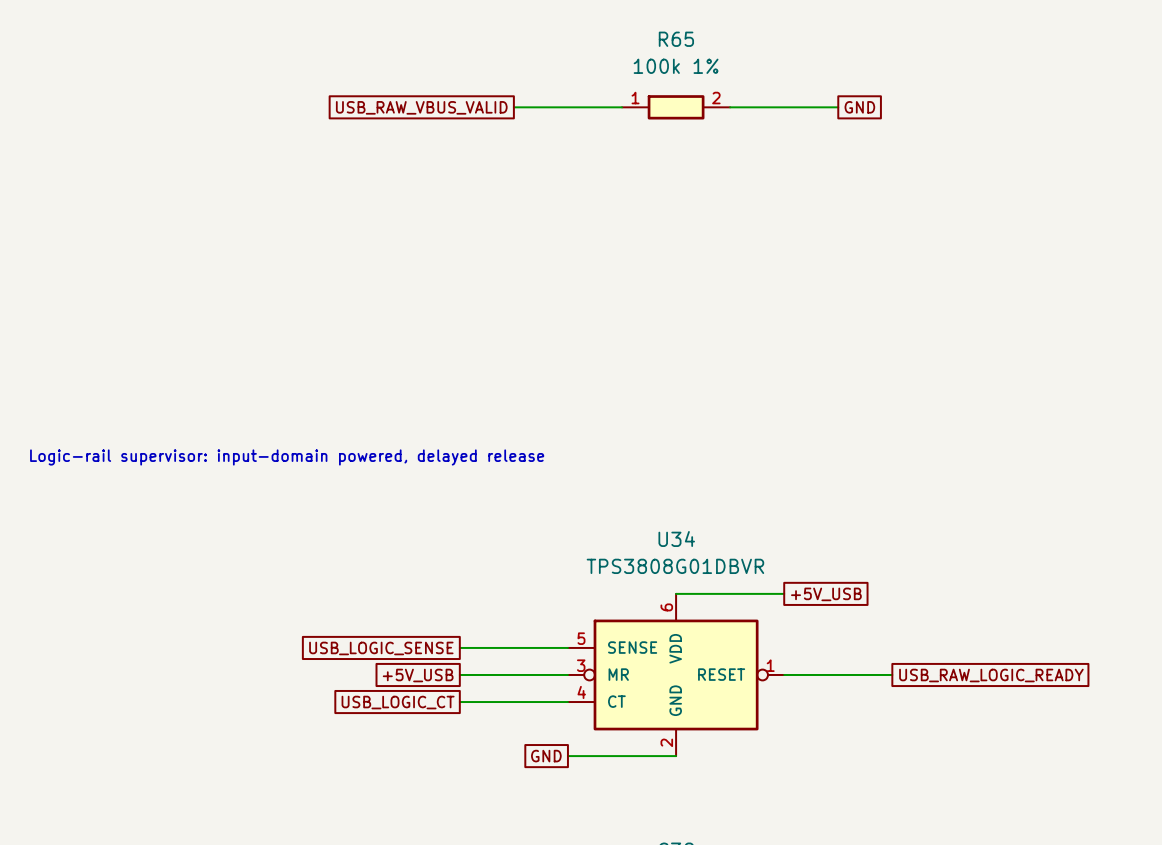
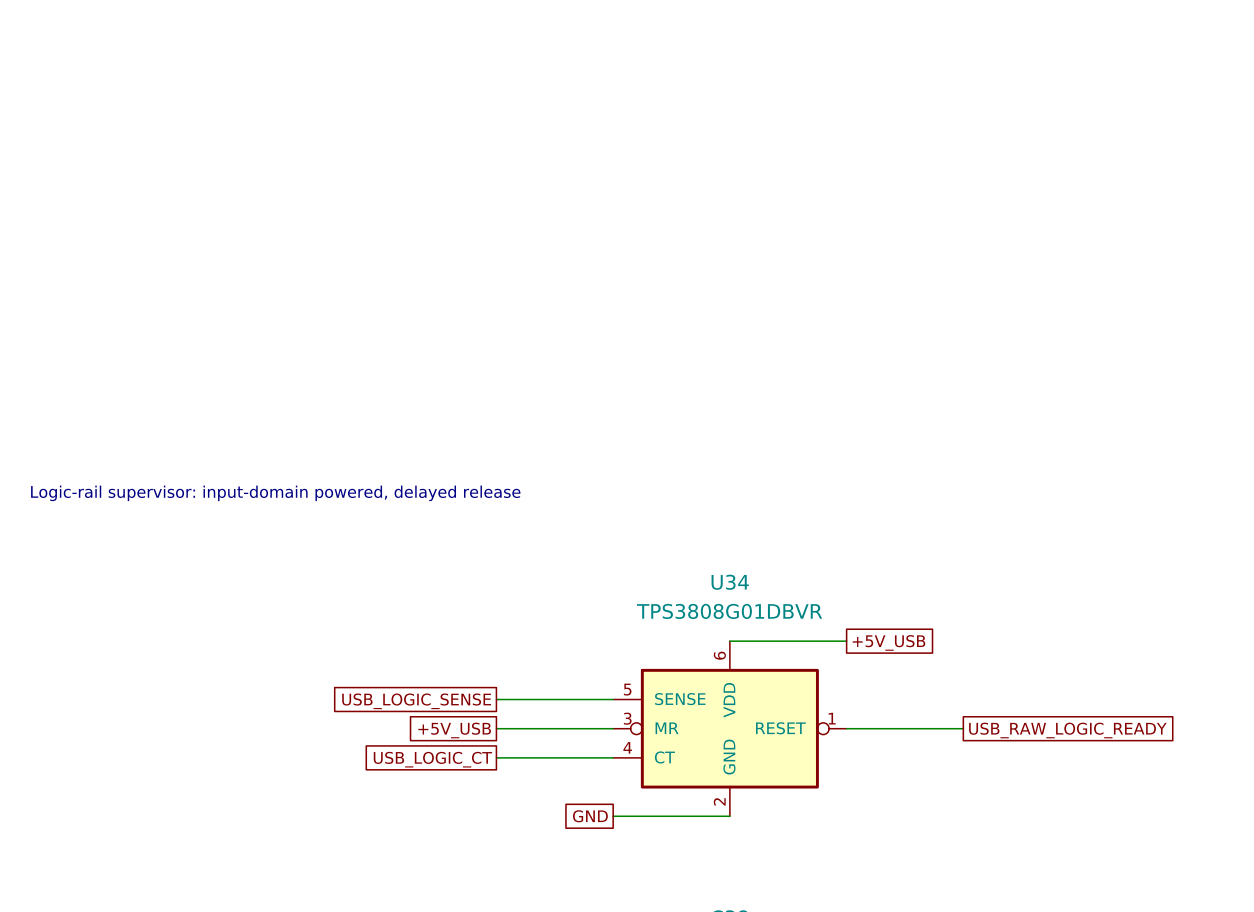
global label: USB_RAW_VBUS_VALID (421, 107) -> none
wire: (513, 107) (622, 107) -> none
R65: 100k 1% (676, 107) -> none
wire: (730, 107) (838, 107) -> none
global label: GND (859, 107) -> none

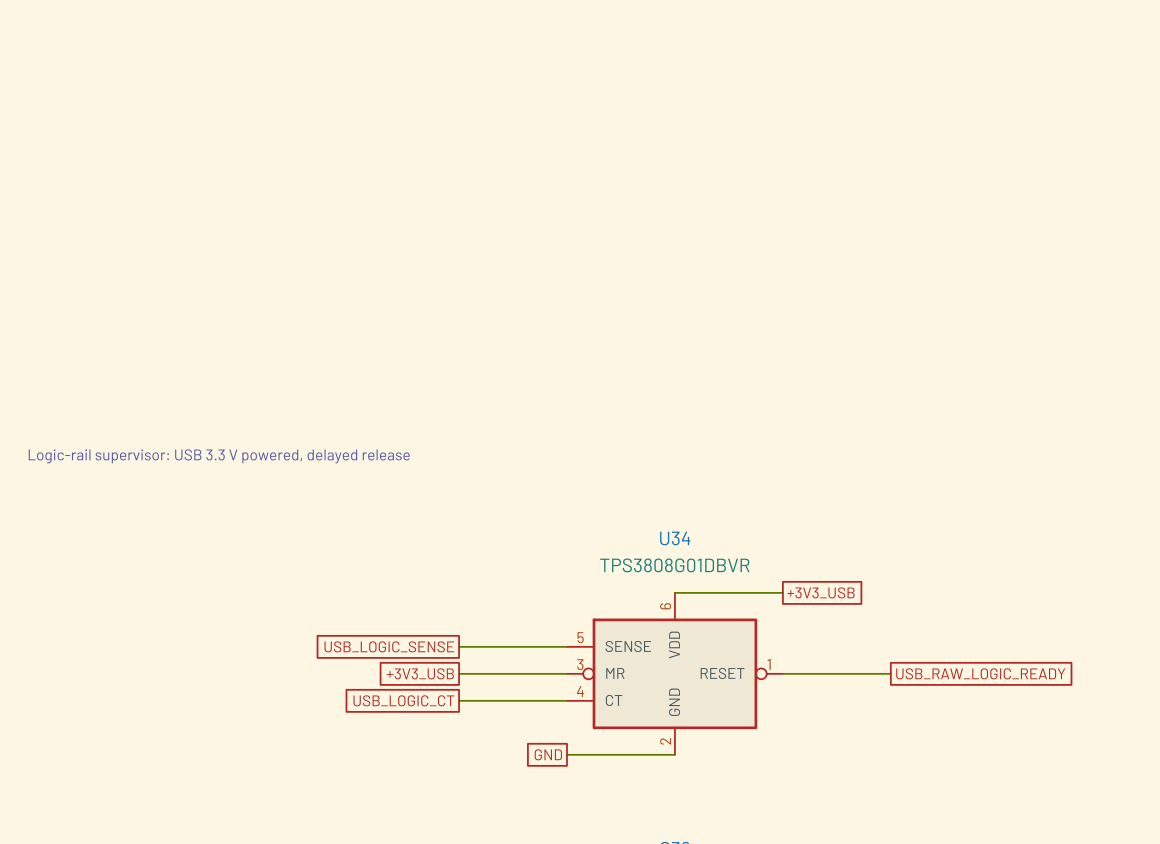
text: Logic-rail supervisor: input-domain powered, delayed release (275, 493) -> Logic-rail supervisor: USB 3.3 V powered, delayed release (219, 456)
global label: +5V_USB (888, 642) -> +3V3_USB (821, 592)
global label: +5V_USB (454, 730) -> +3V3_USB (420, 673)

